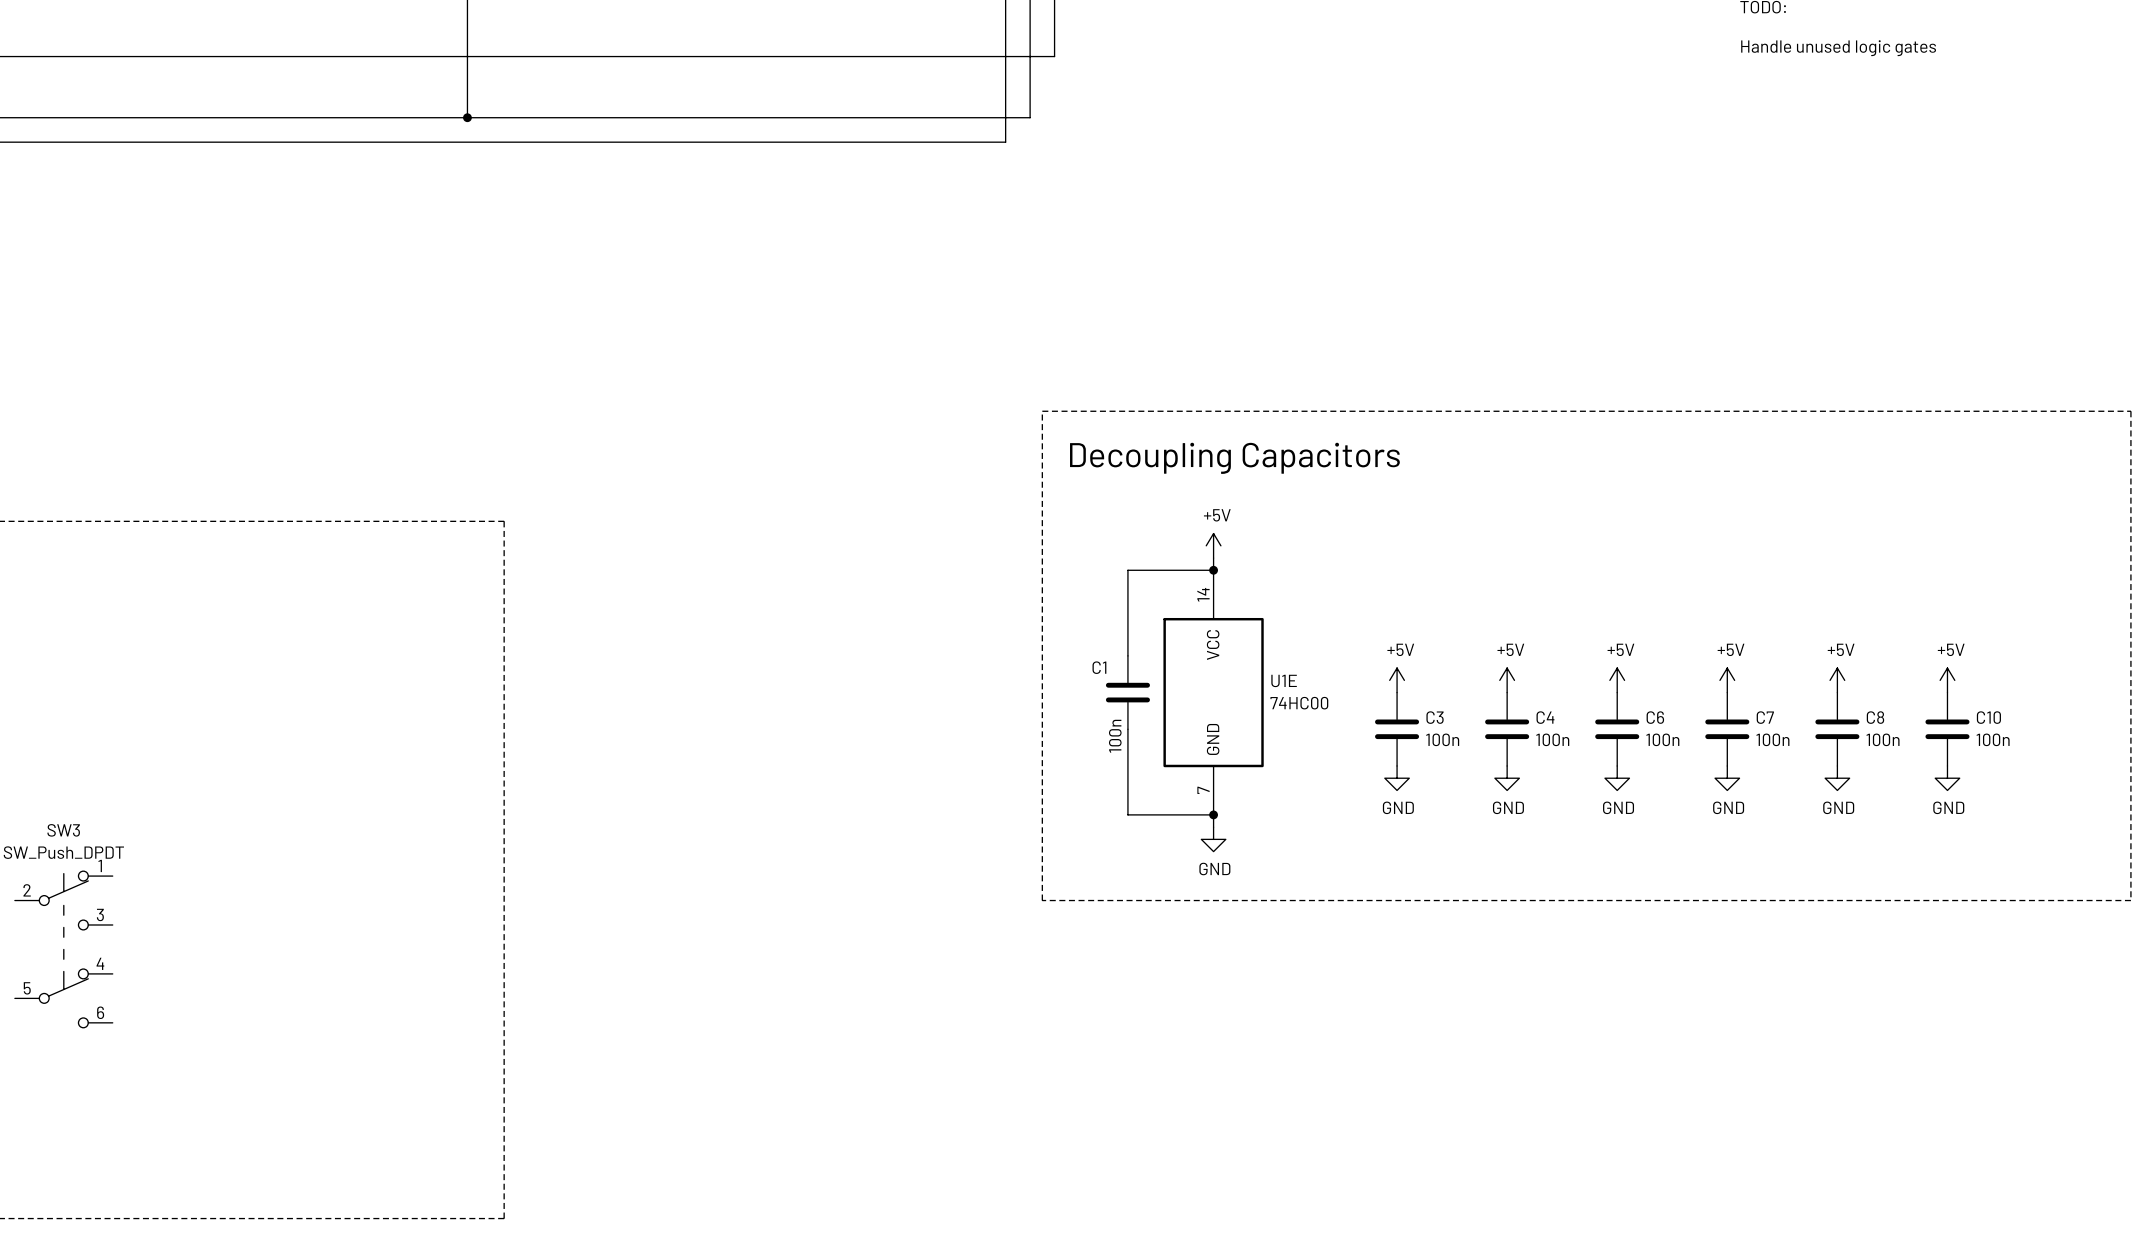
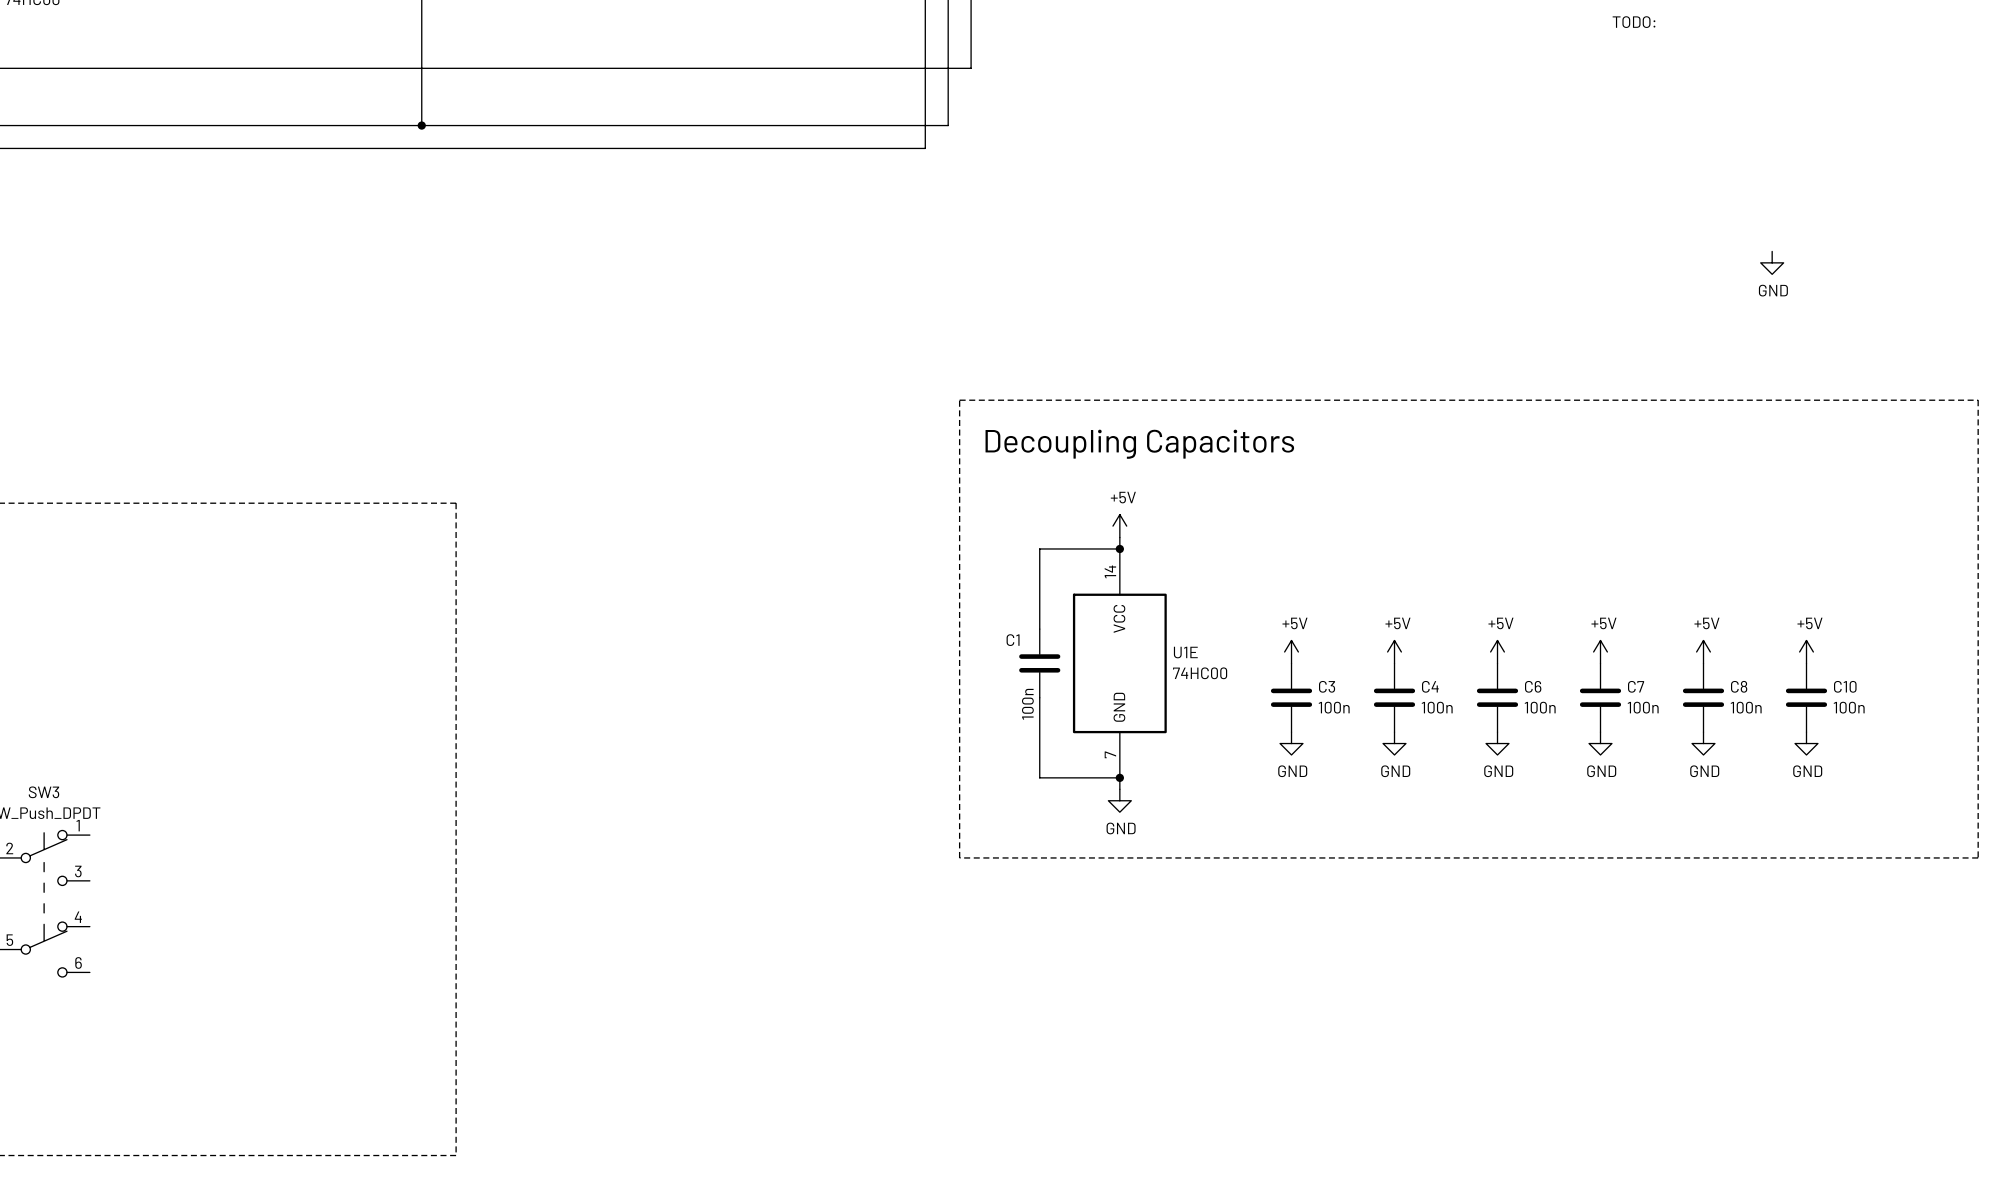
text: Handle unused logic gates (1838, 48) -> none
power symbol: none -> GND (1772, 262)

